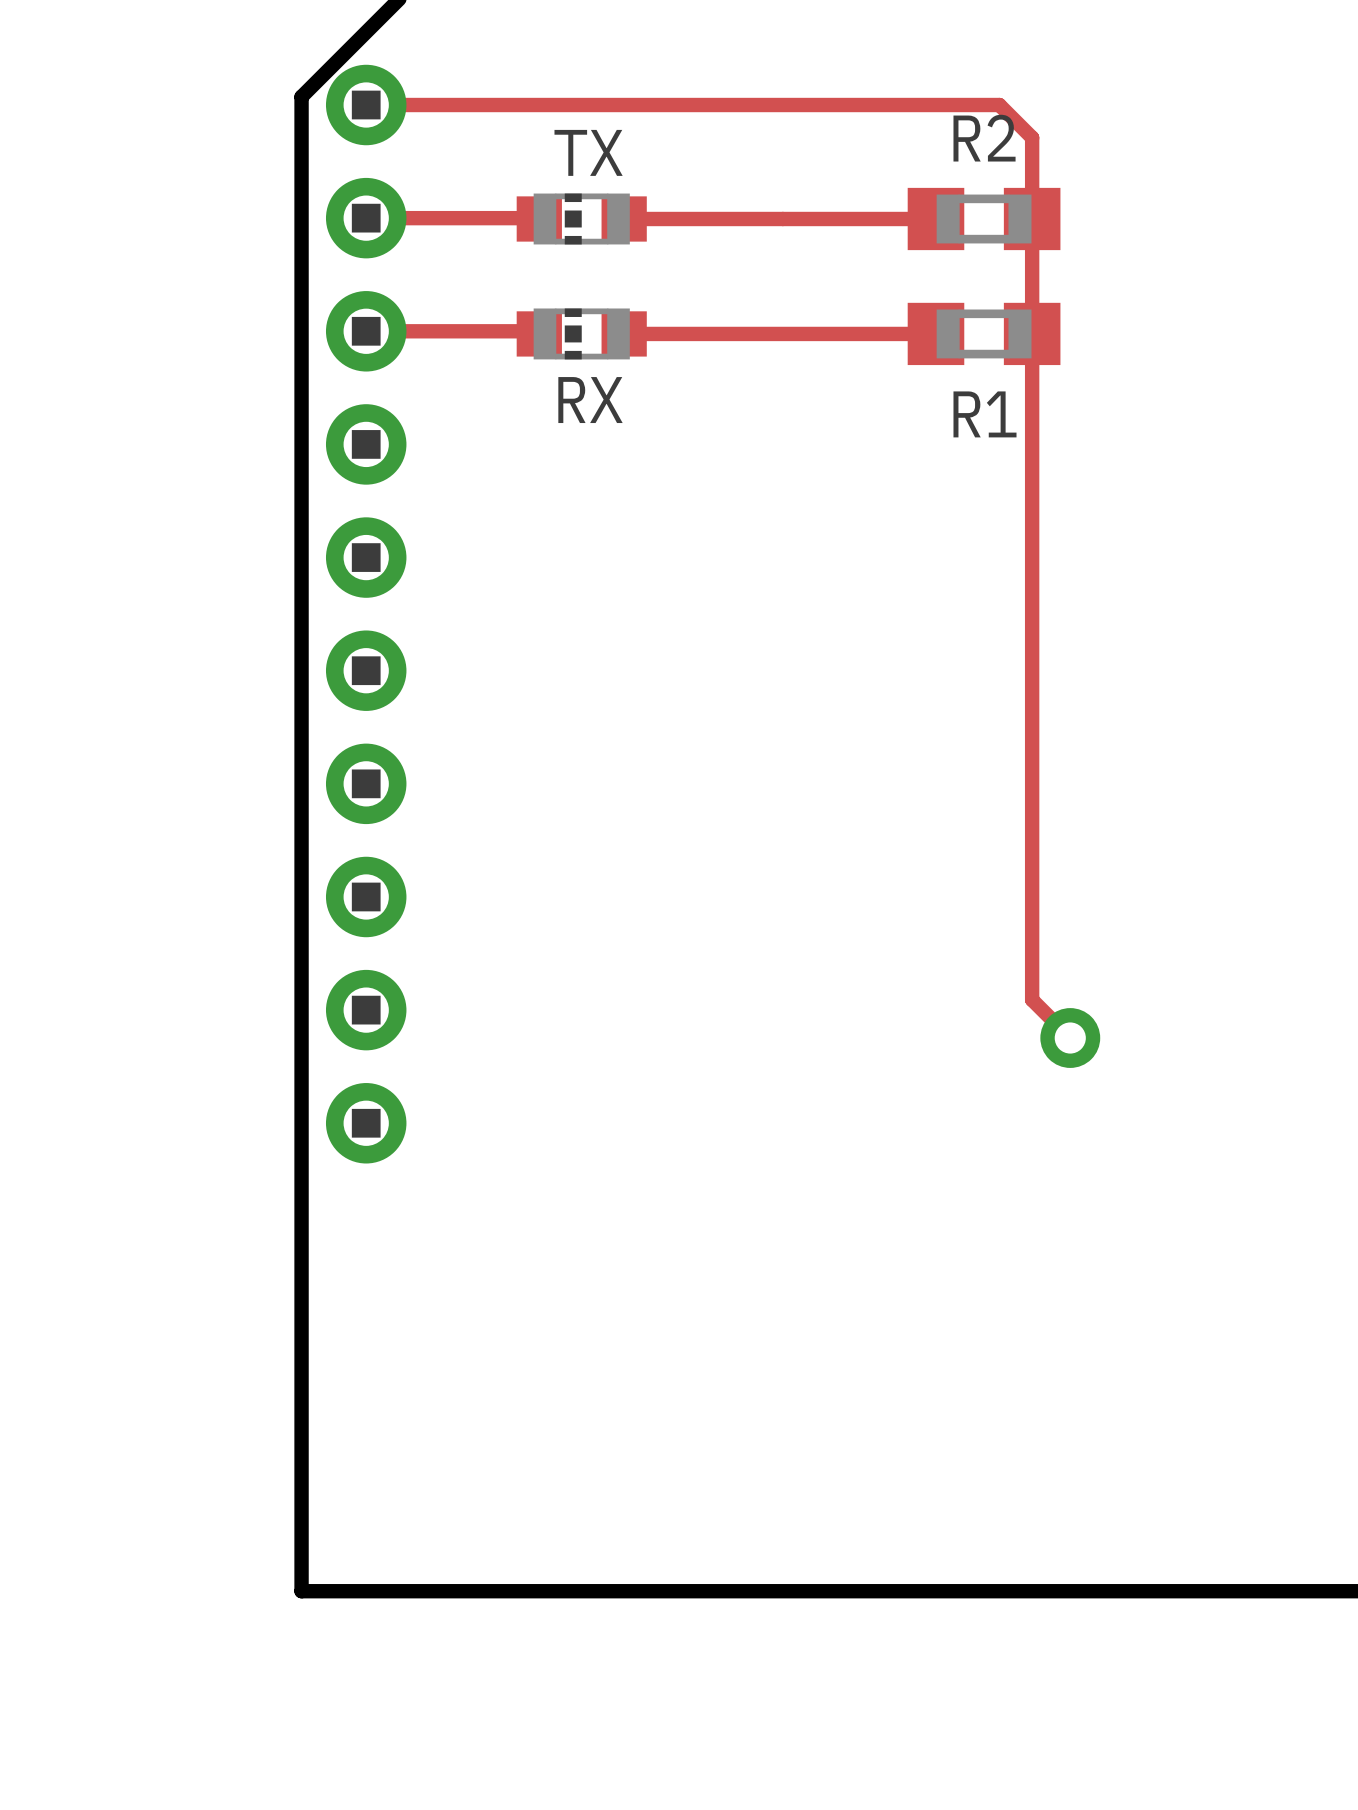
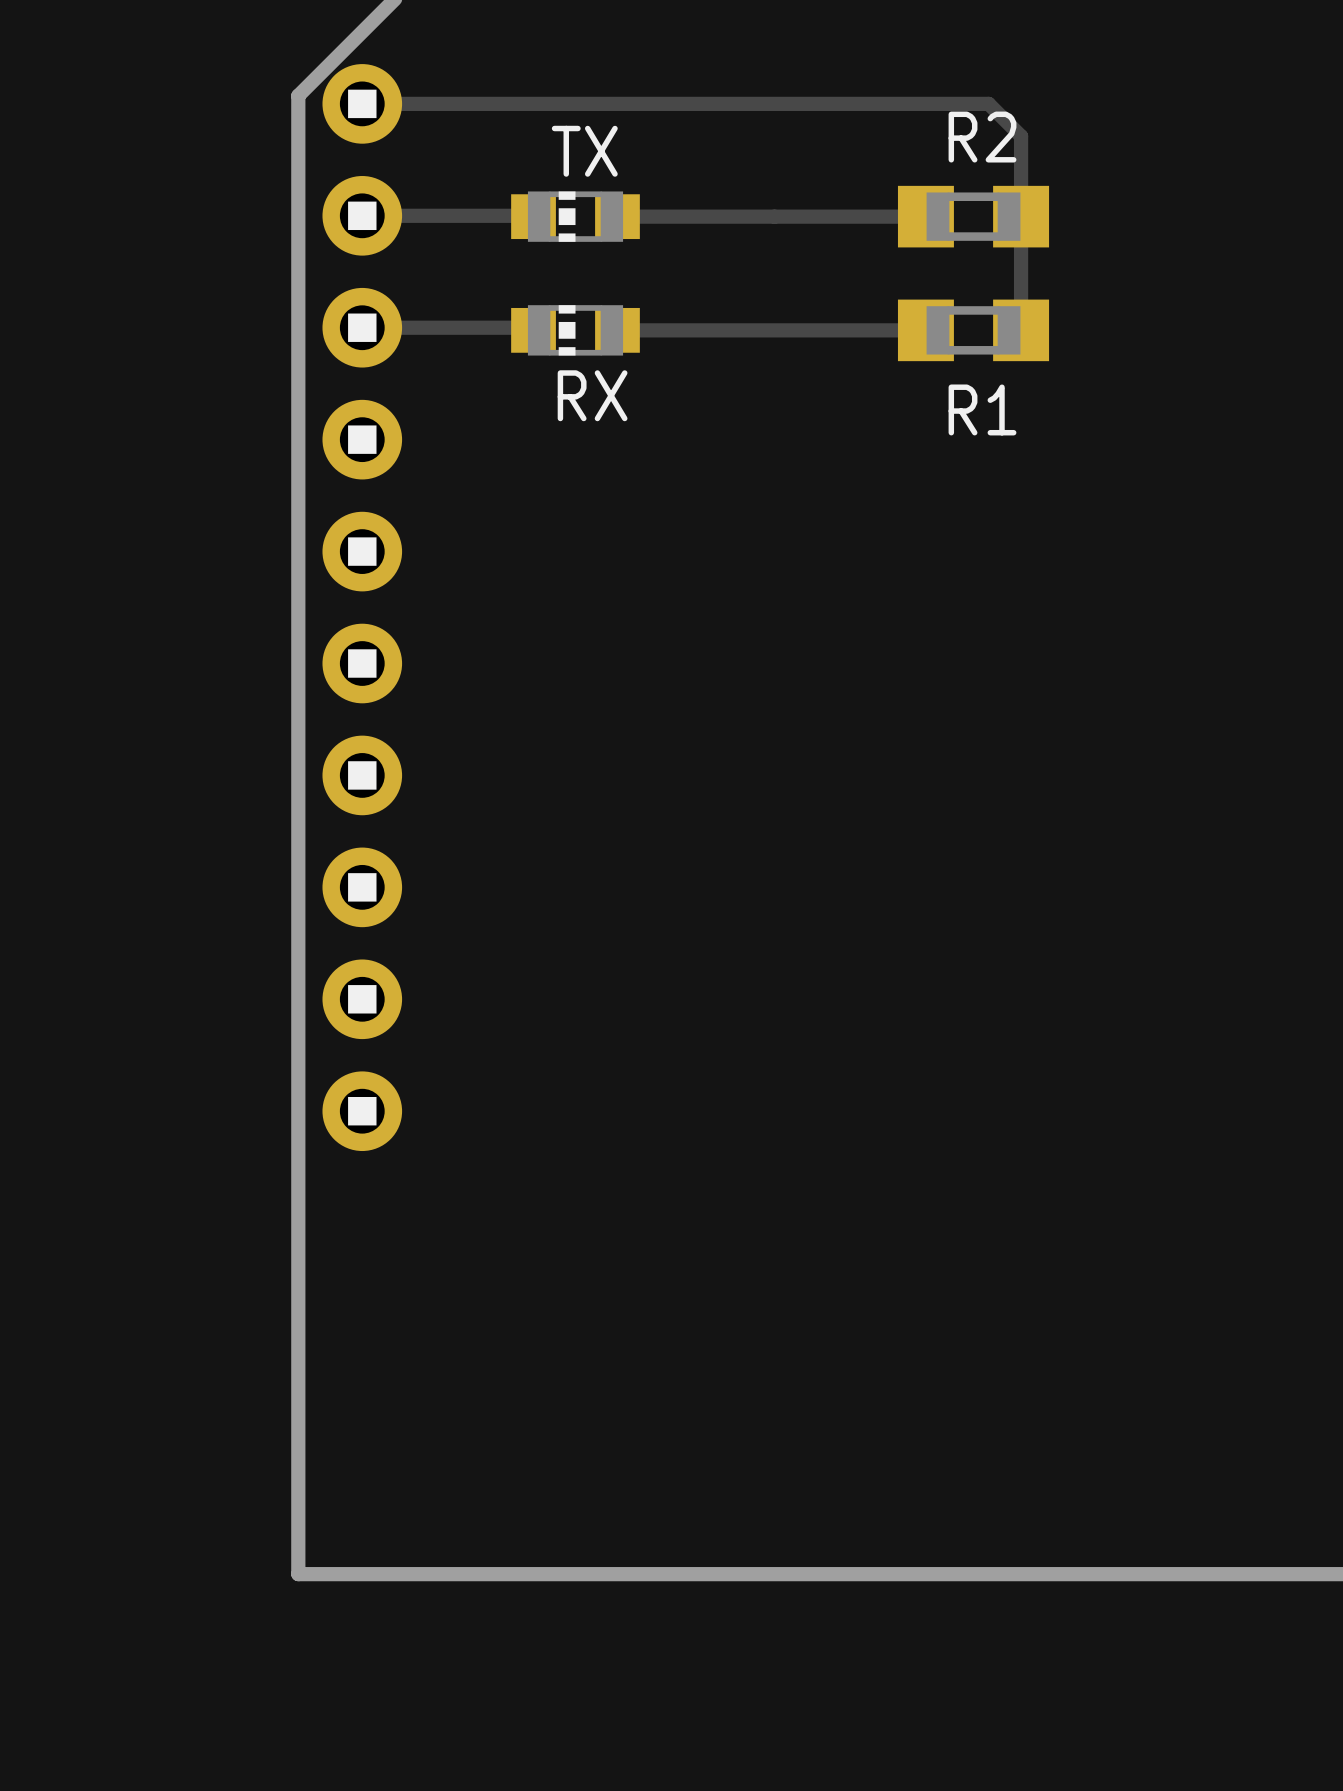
track: (1032, 333) (1032, 999) (1070, 1038) -> none
via: (1070, 1038) -> none

